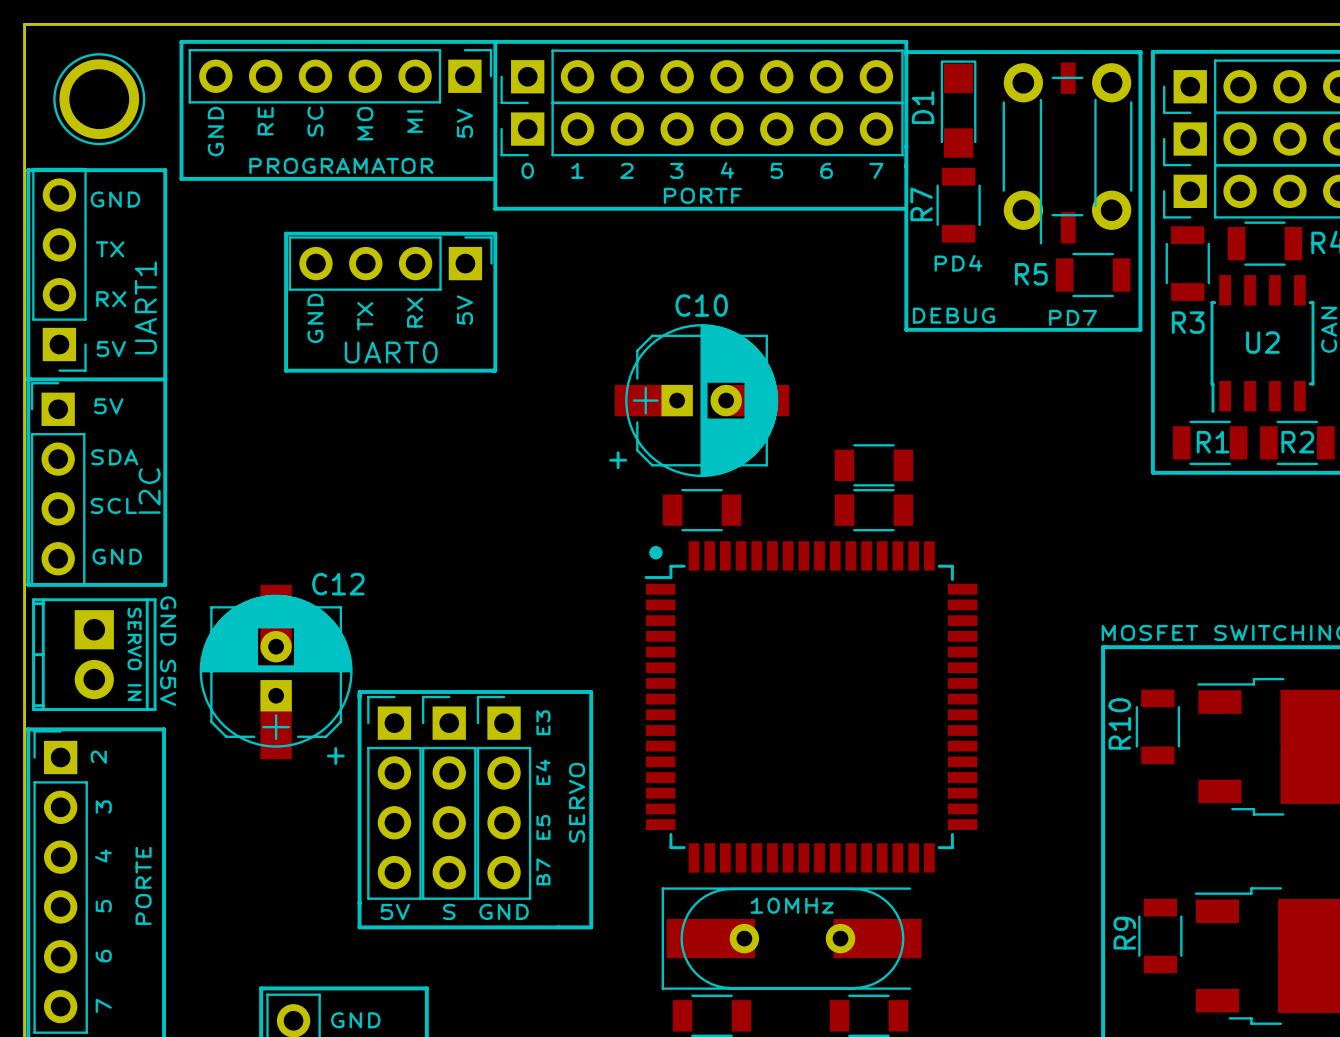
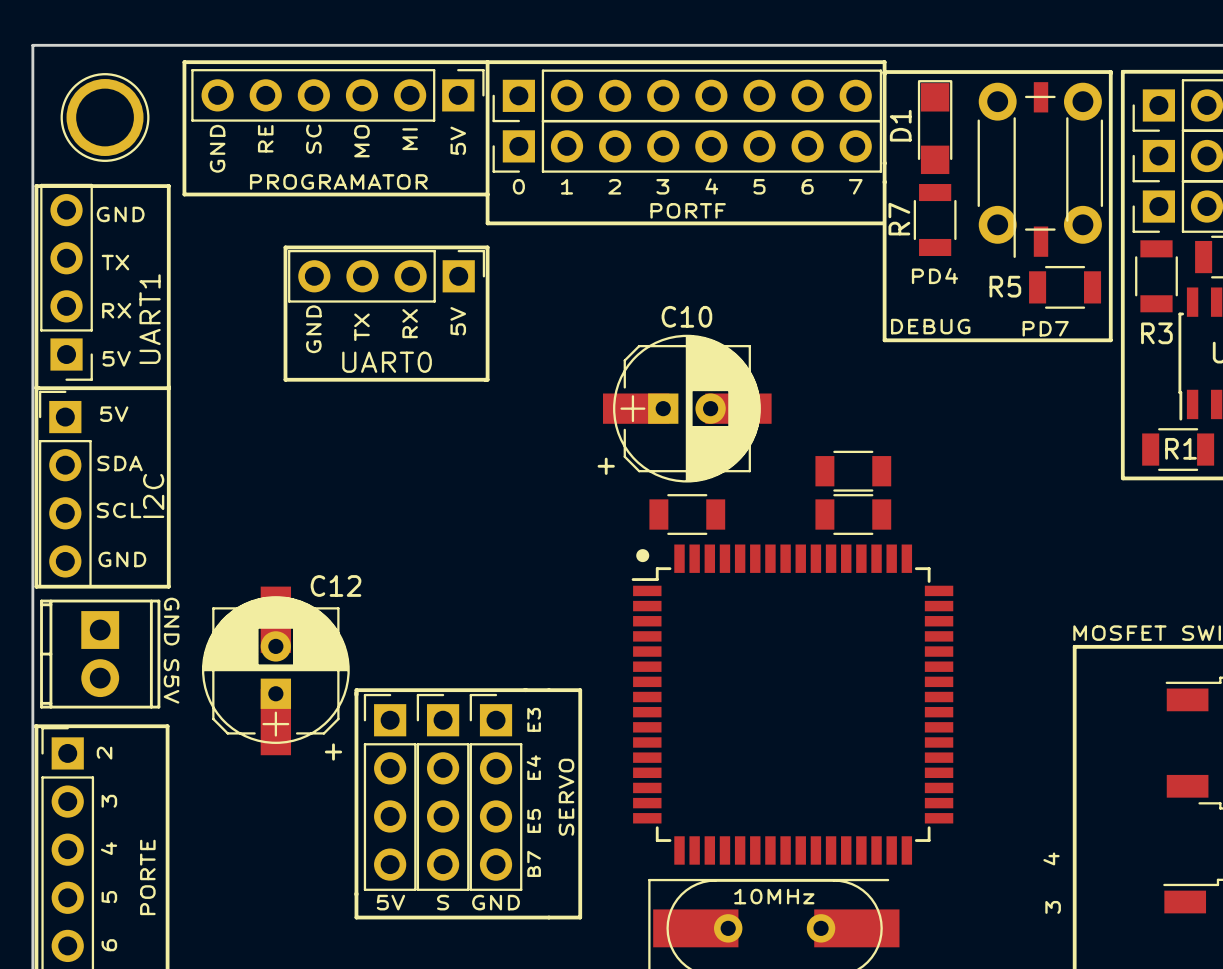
text: SERVO IN (134, 654) -> none
R10: (1157, 726) -> none
text: none -> 4 (1051, 858)
text: none -> 3 (1053, 907)
R9: (1160, 936) -> none

